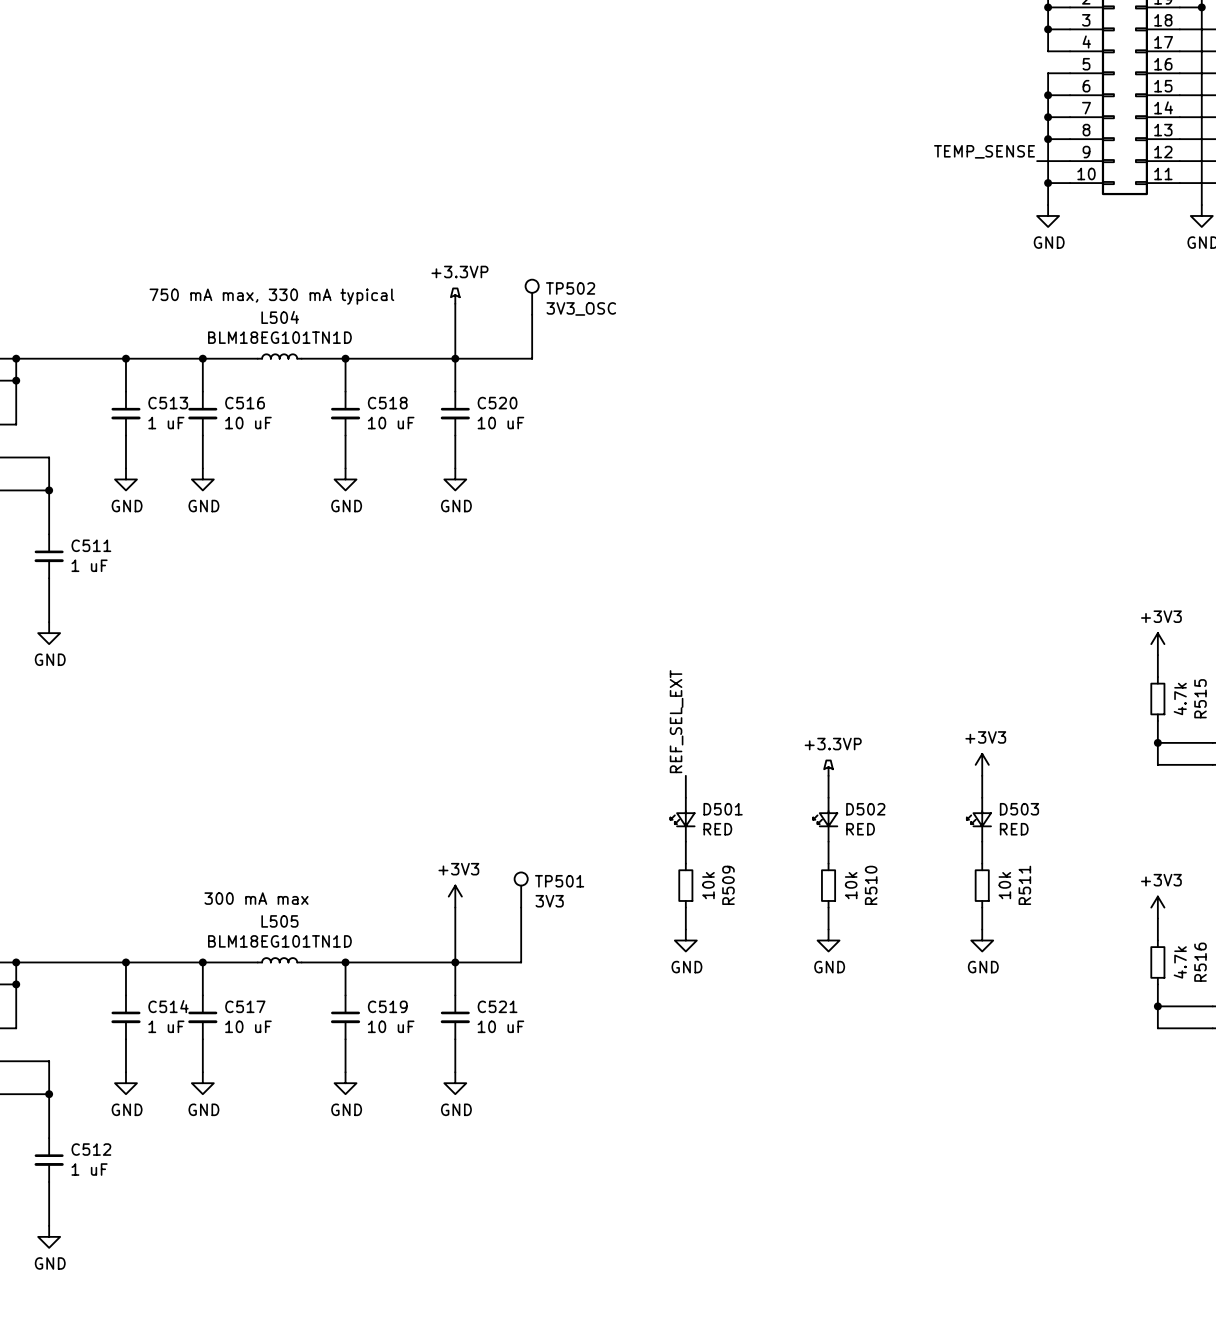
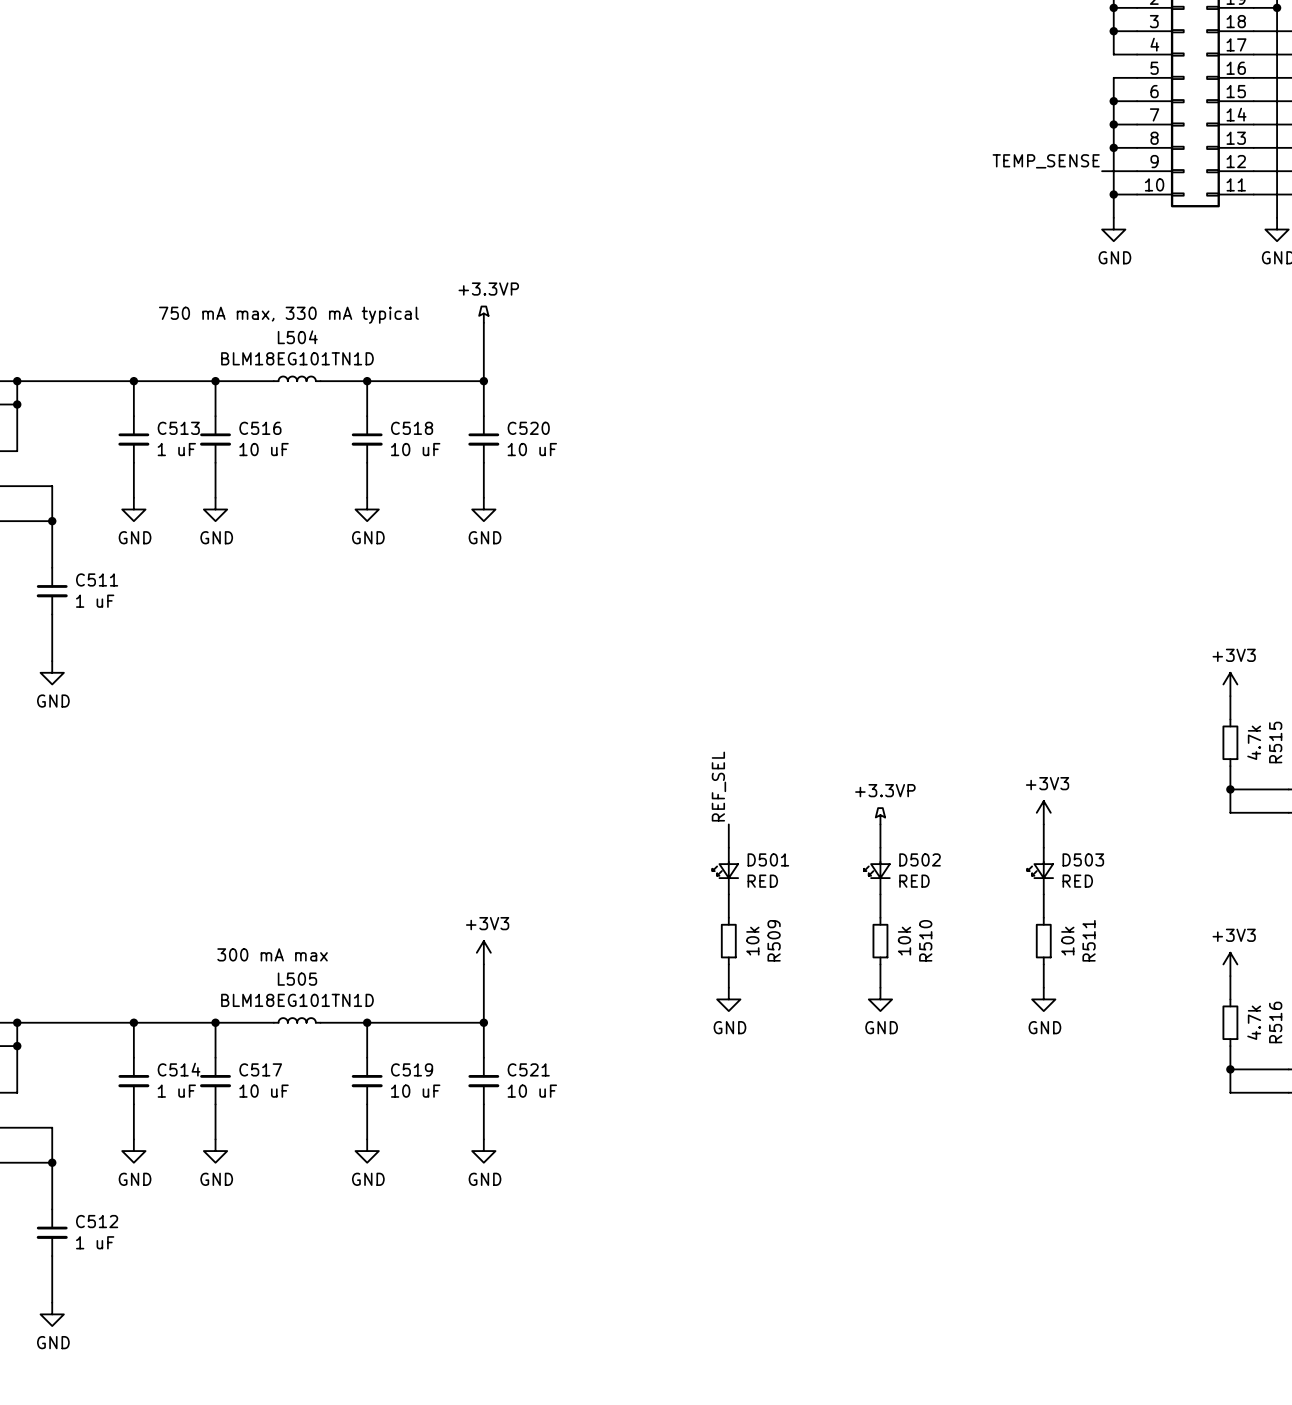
TP502: 3V3_OSC (532, 297) -> none
wire: (532, 314) (532, 358) (455, 358) -> none
label: REF_SEL_EXT (676, 721) -> REF_SEL (718, 786)
TP501: 3V3 (521, 890) -> none
wire: (521, 907) (521, 962) (455, 962) -> none

